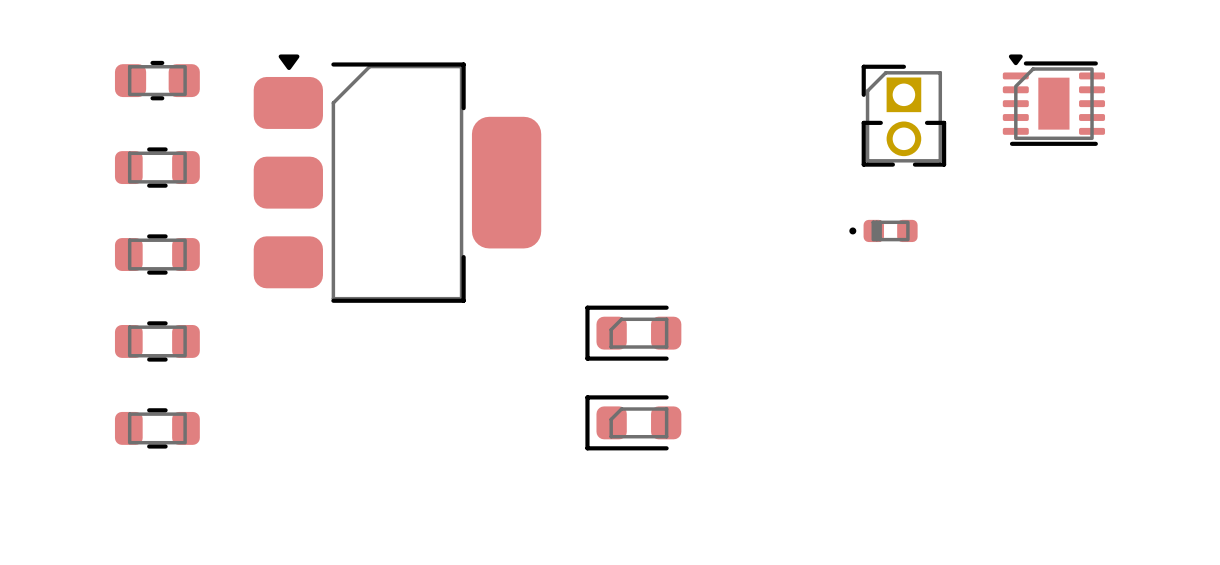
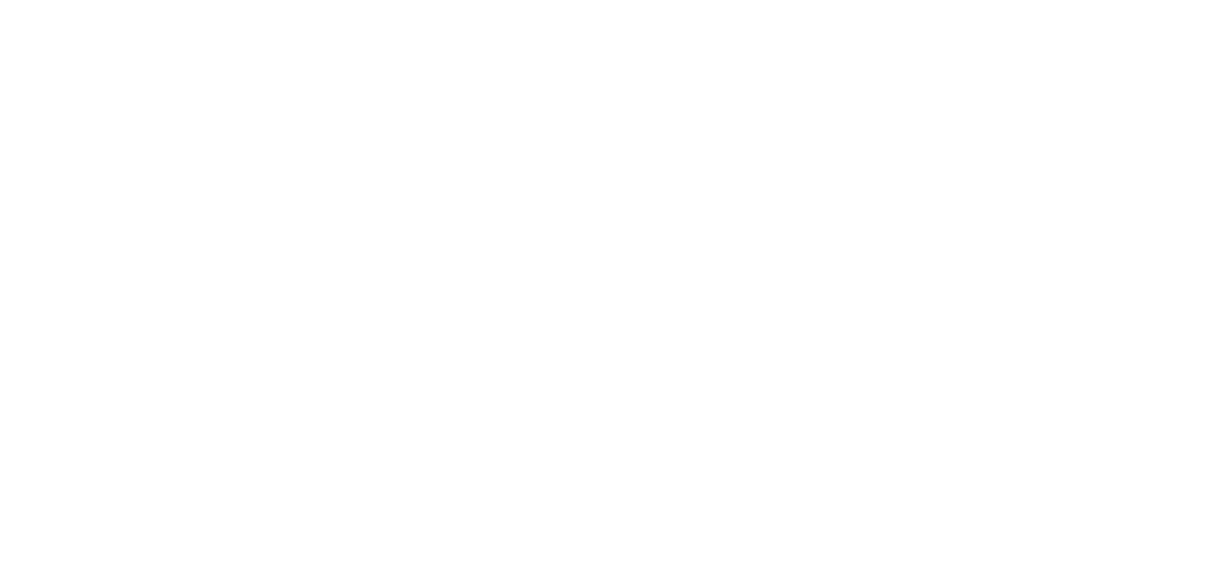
part: (157, 80) -> none
part: (1053, 100) -> none
part: (903, 115) -> none
part: (157, 167) -> none
part: (397, 178) -> none
part: (883, 230) -> none
part: (157, 254) -> none
part: (633, 333) -> none
part: (157, 341) -> none
part: (633, 422) -> none
part: (157, 428) -> none

